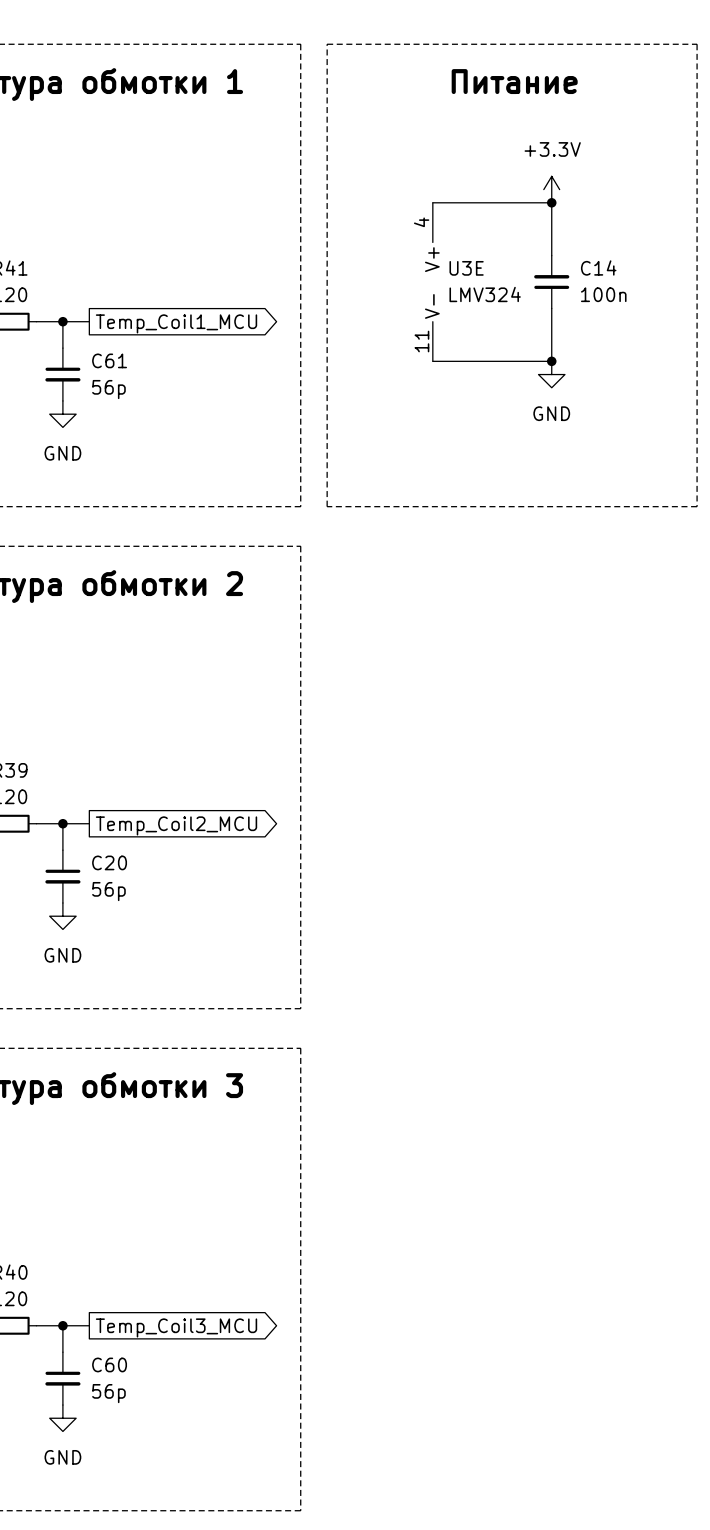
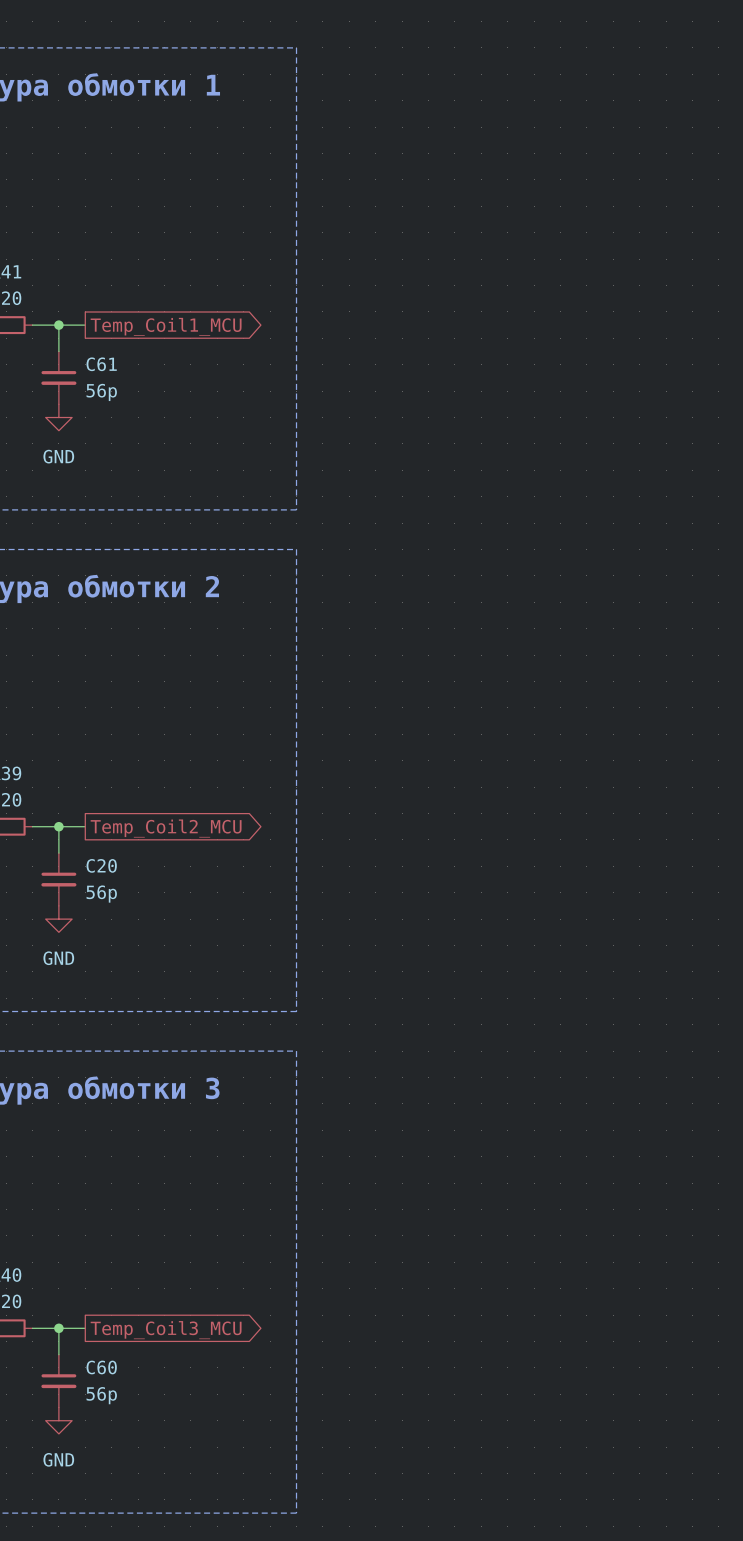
line: (327, 44) (697, 44) (697, 506) (327, 506) (327, 44) -> none
text: Питание (514, 81) -> none
power symbol: +3.3V (551, 189) -> none
wire: (432, 202) (551, 202) (551, 255) -> none
junction: (551, 202) -> none
U3E: LMV324 (432, 282) -> none
C14: 100n (551, 282) -> none
wire: (551, 308) (551, 361) (432, 361) -> none
junction: (551, 361) -> none
power symbol: GND (551, 374) -> none

